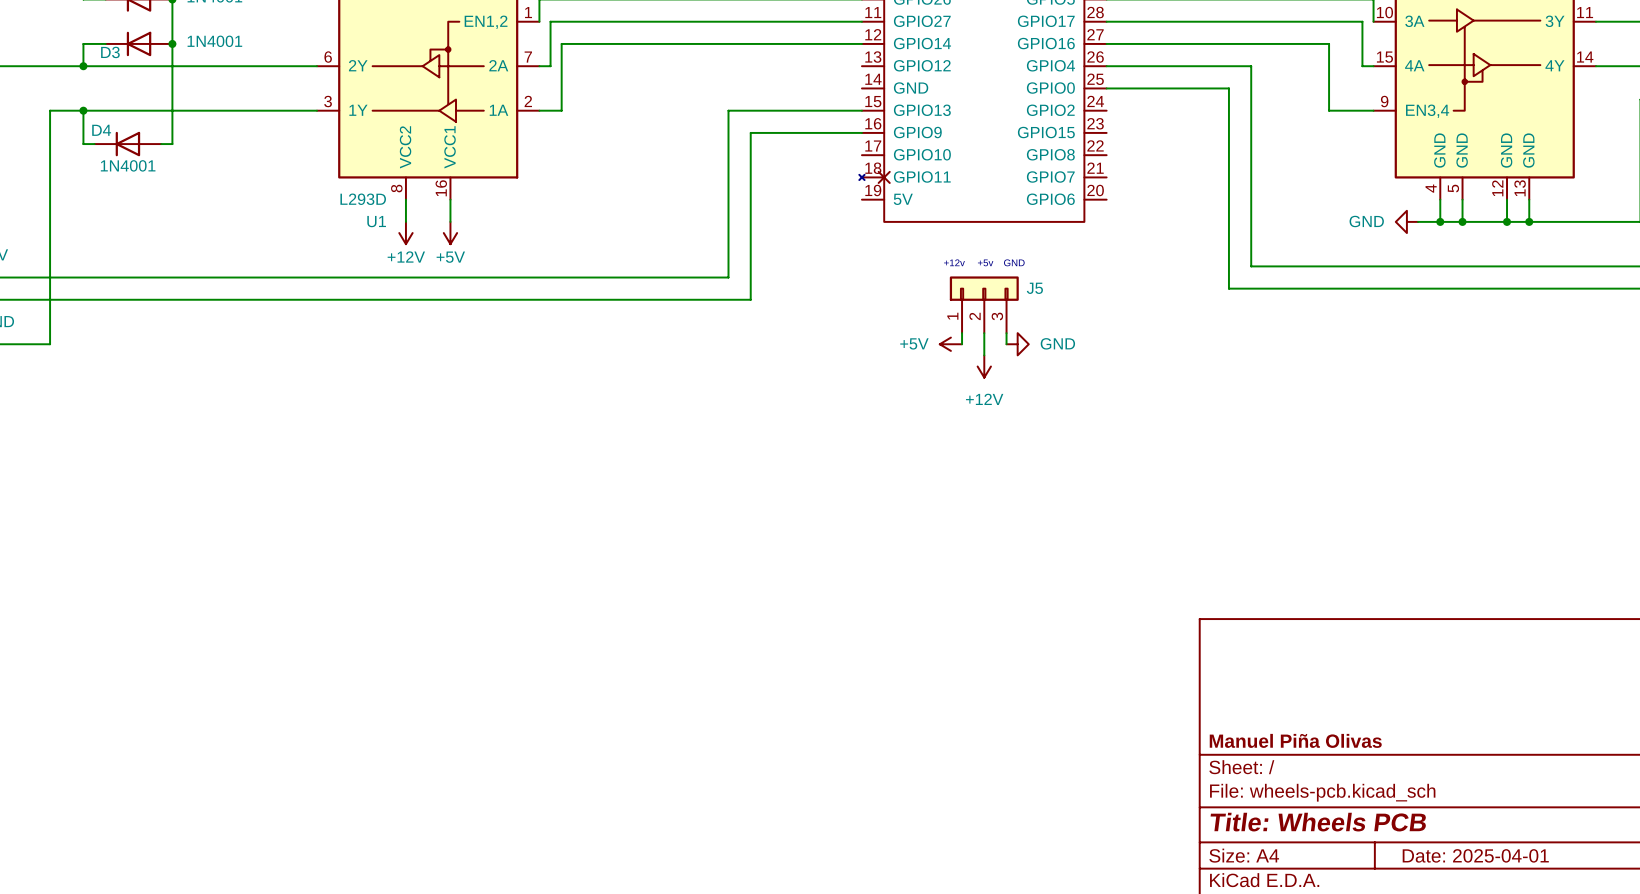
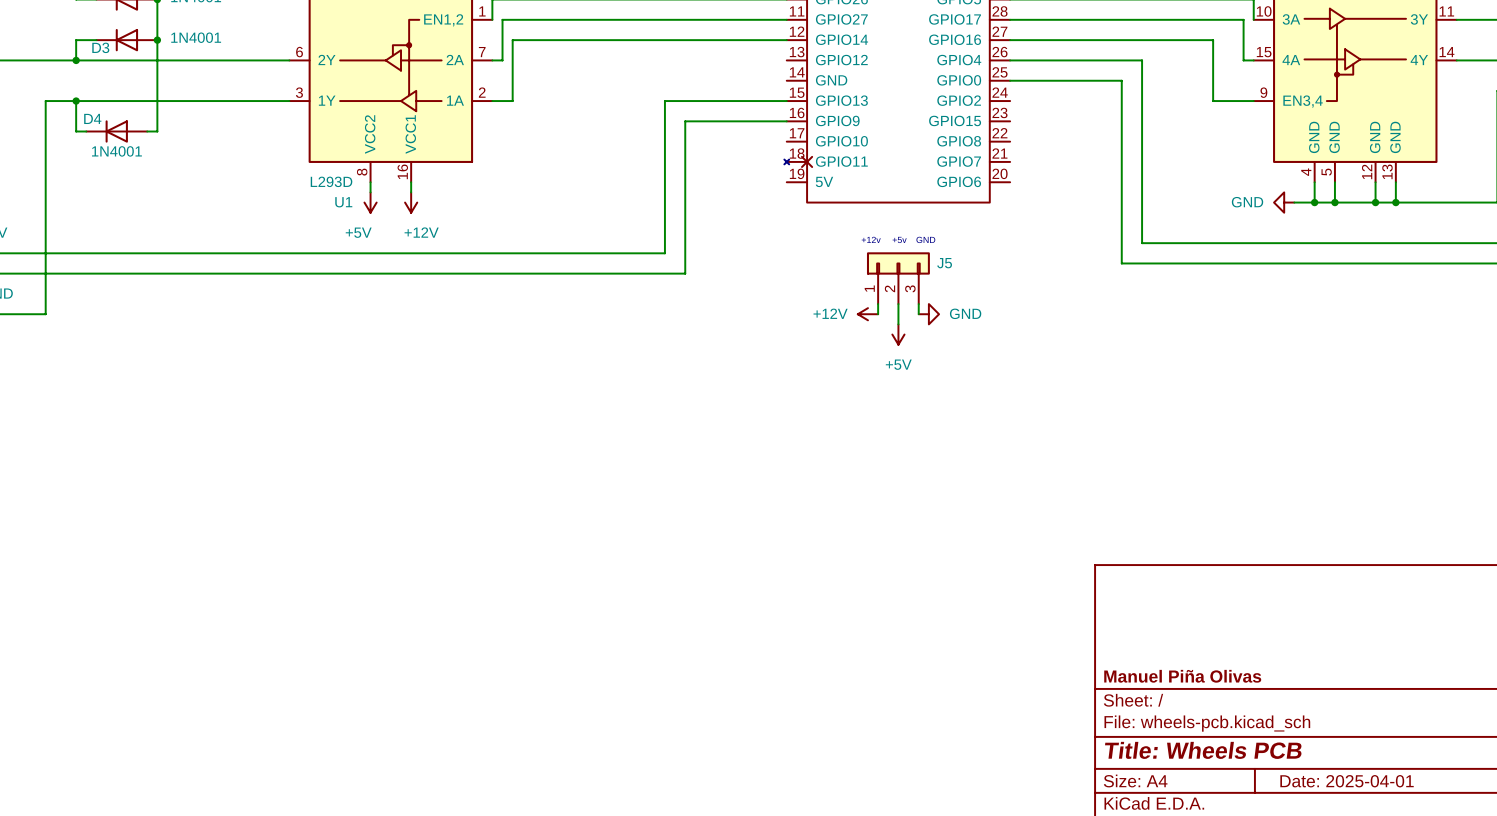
power symbol position: +12V (405, 233) -> +12V (411, 202)
power symbol position: +5V (450, 233) -> +5V (370, 202)
power symbol text position: +12V (406, 257) -> +12V (421, 232)
power symbol text position: +5V (450, 257) -> +5V (358, 232)
power symbol: +5V (950, 344) -> +12V (867, 314)
power symbol: +12V (984, 366) -> +5V (898, 334)

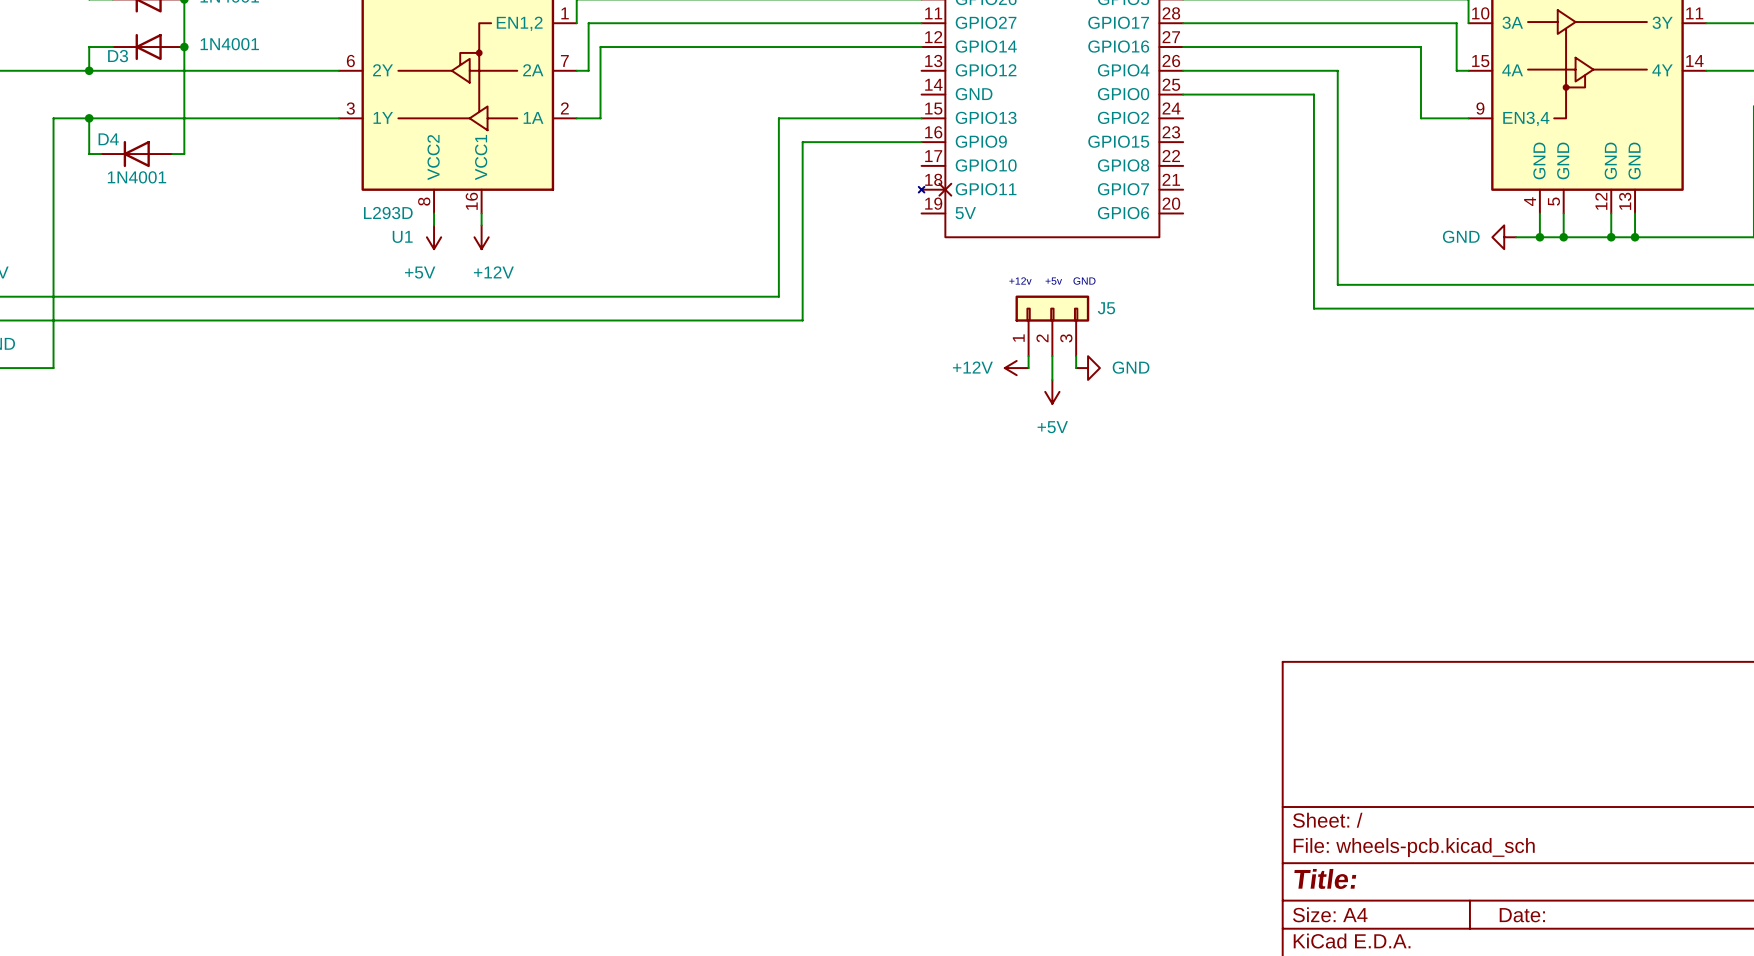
title block: Manuel Piña Olivas (1182, 676) -> none
title block: Title: Wheels PCB (1203, 750) -> Title: (1325, 878)
title block: Date: 2025-04-01 (1347, 781) -> Date: (1522, 915)

